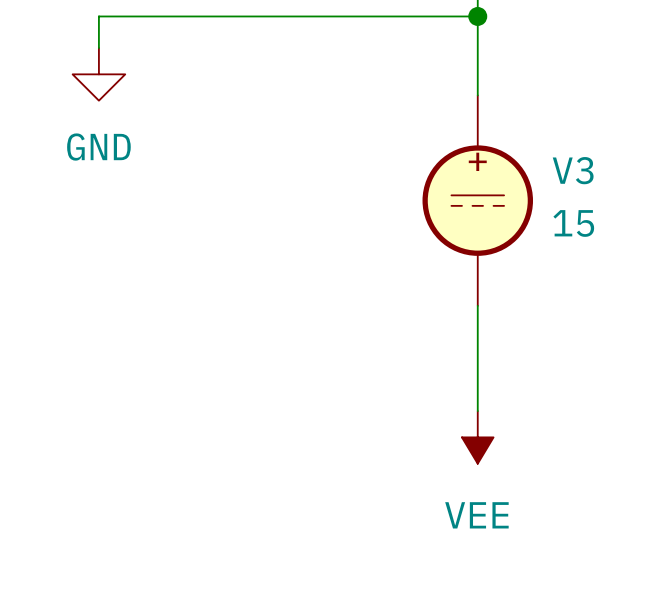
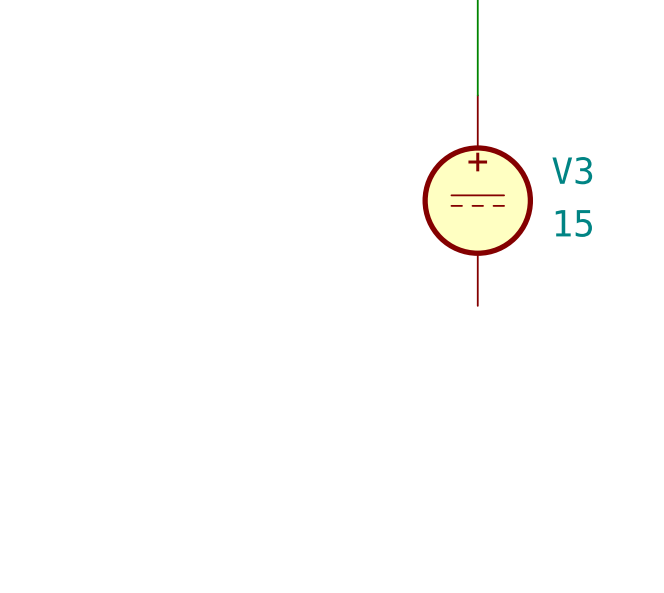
wire: (477, 16) (98, 16) (98, 48) -> none
junction: (477, 16) -> none
power symbol: GND (98, 74) -> none
wire: (477, 305) (477, 411) -> none
power symbol: VEE (477, 437) -> none

